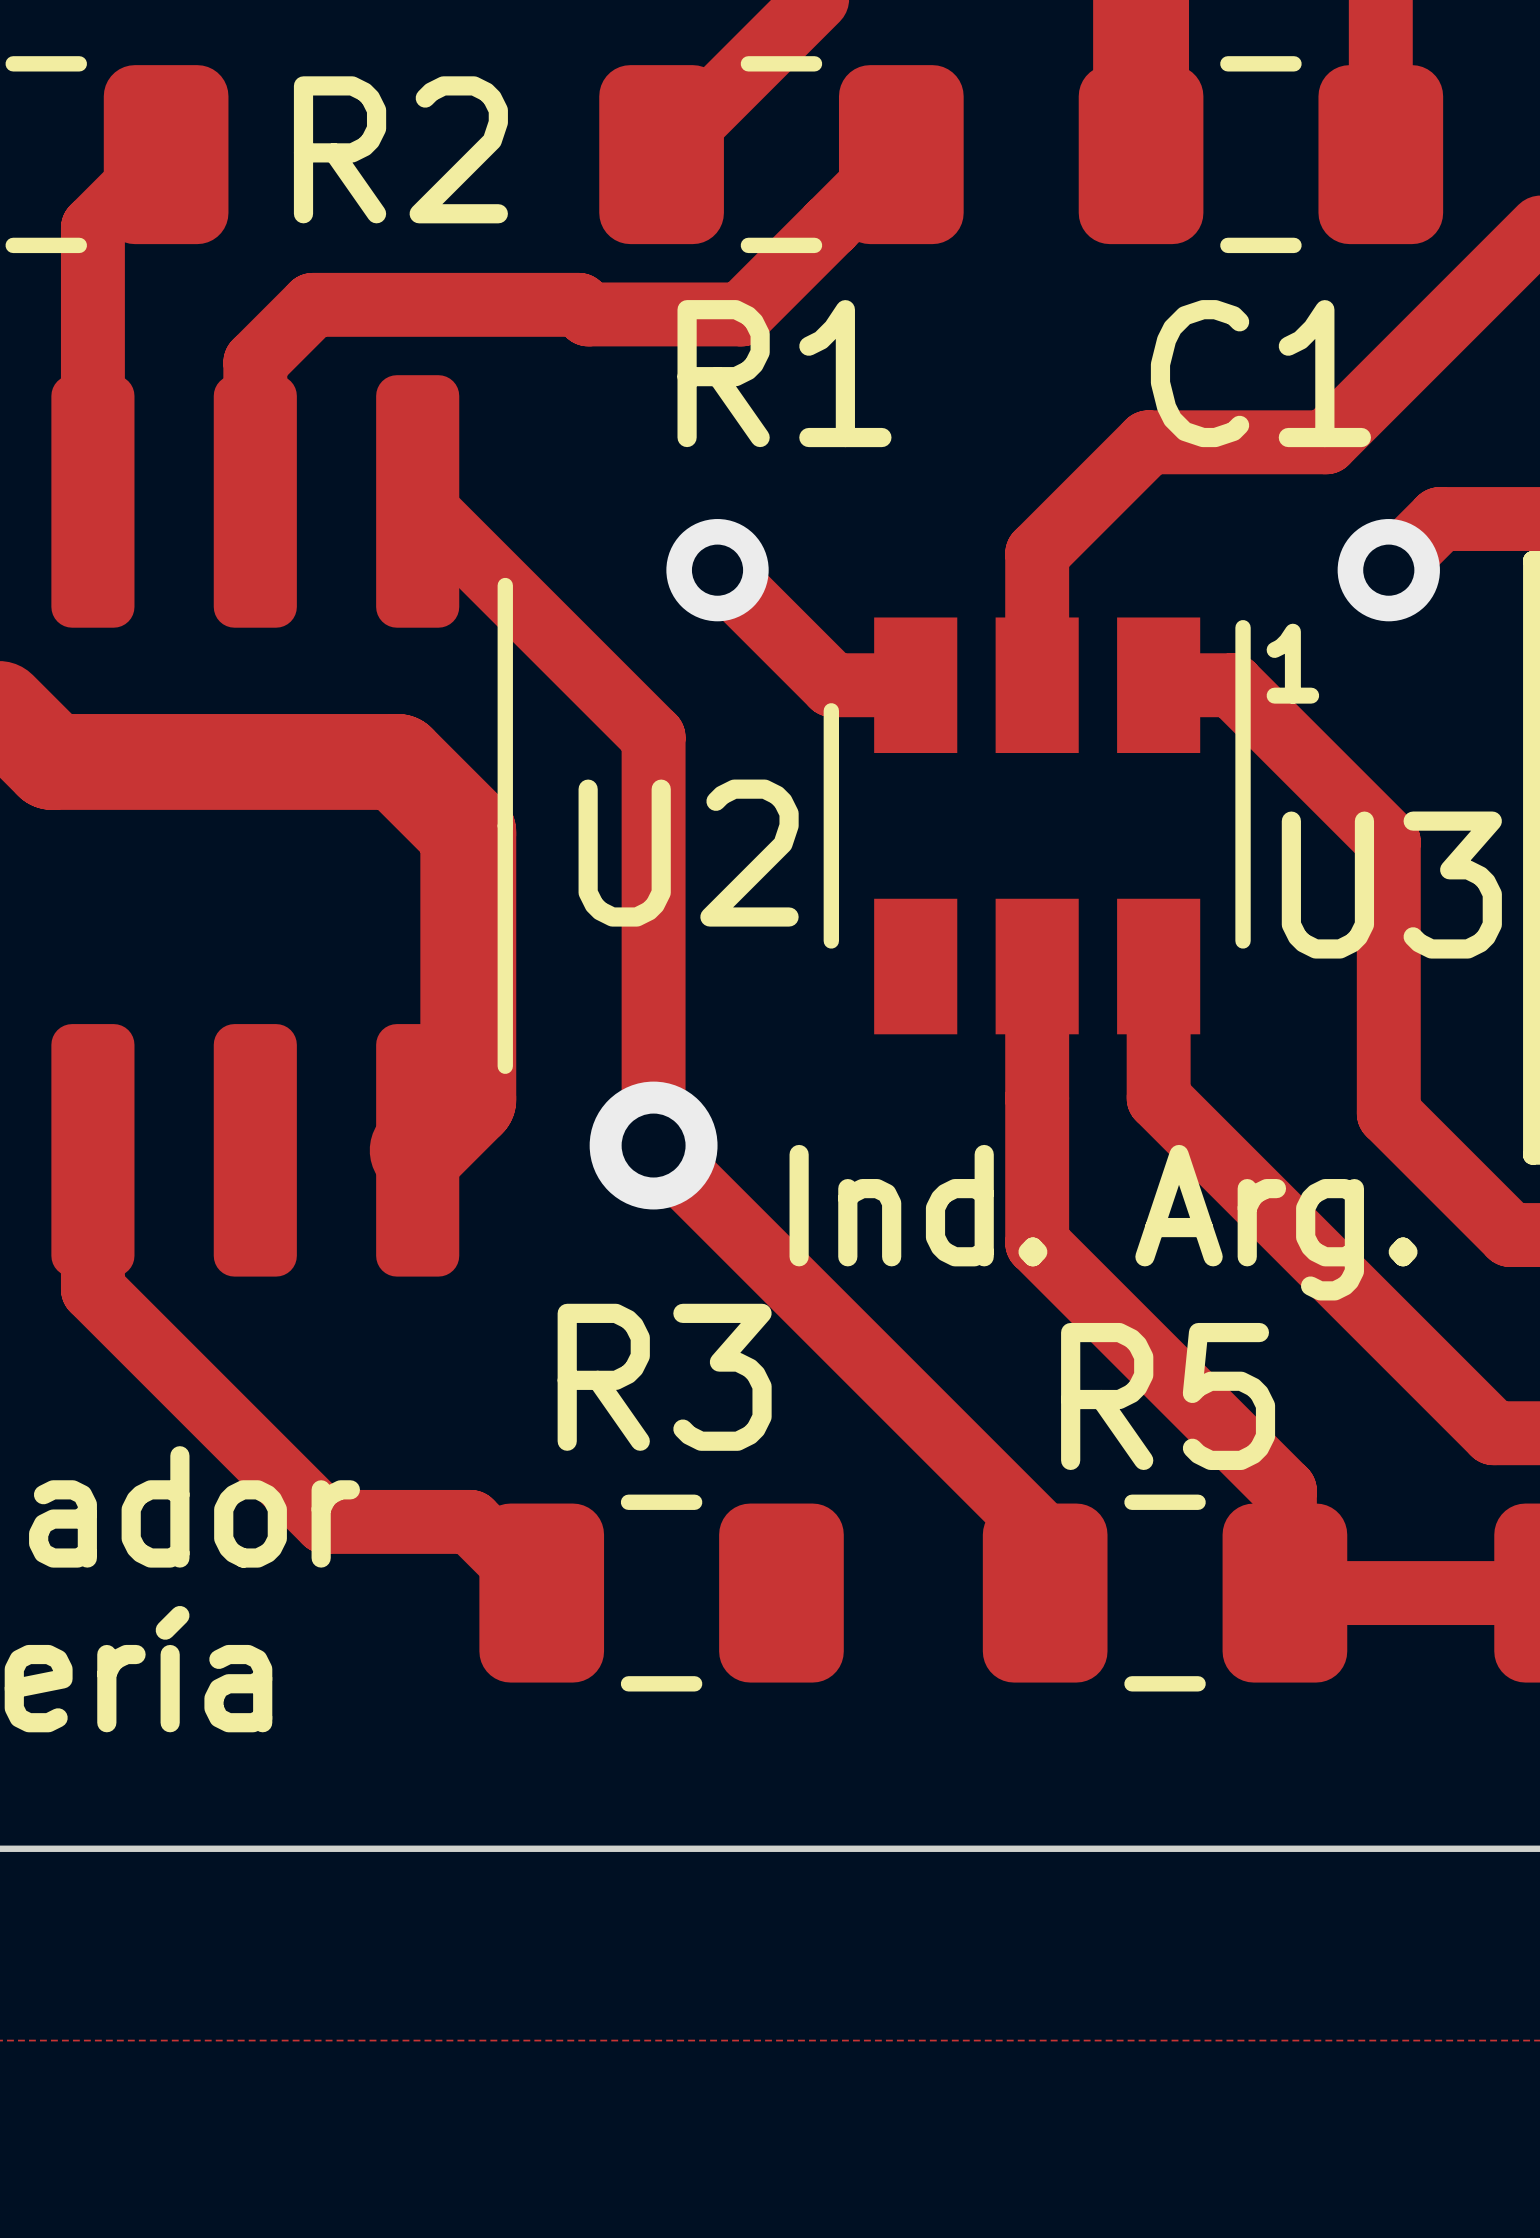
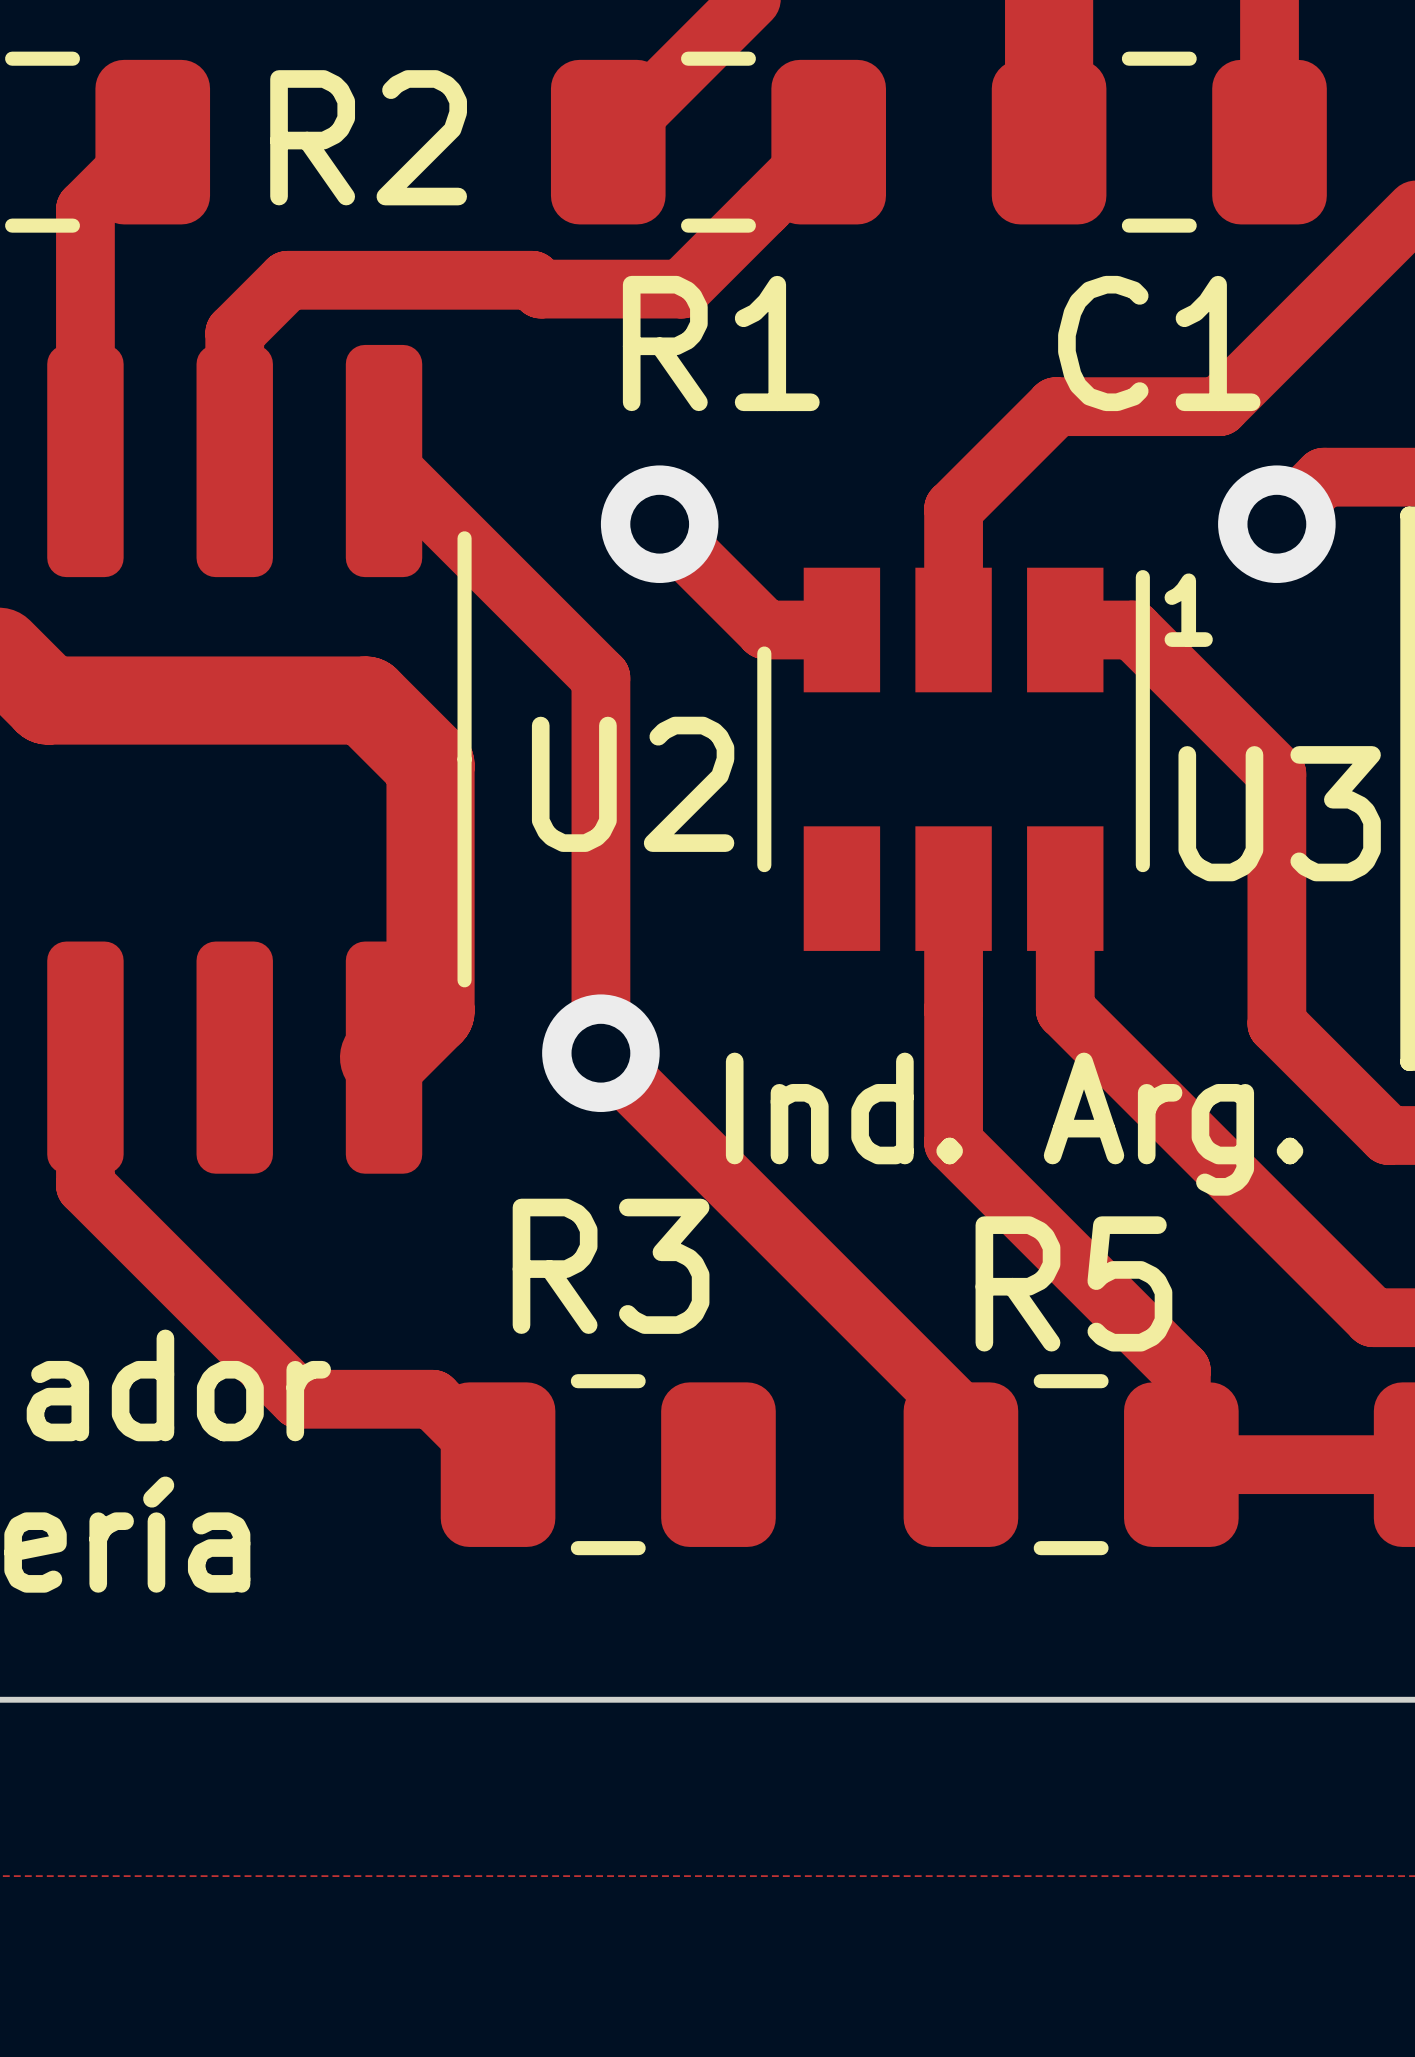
via size: [666, 519, 769, 622] -> [600, 465, 719, 583]
via size: [1337, 519, 1440, 622] -> [1218, 465, 1336, 583]

